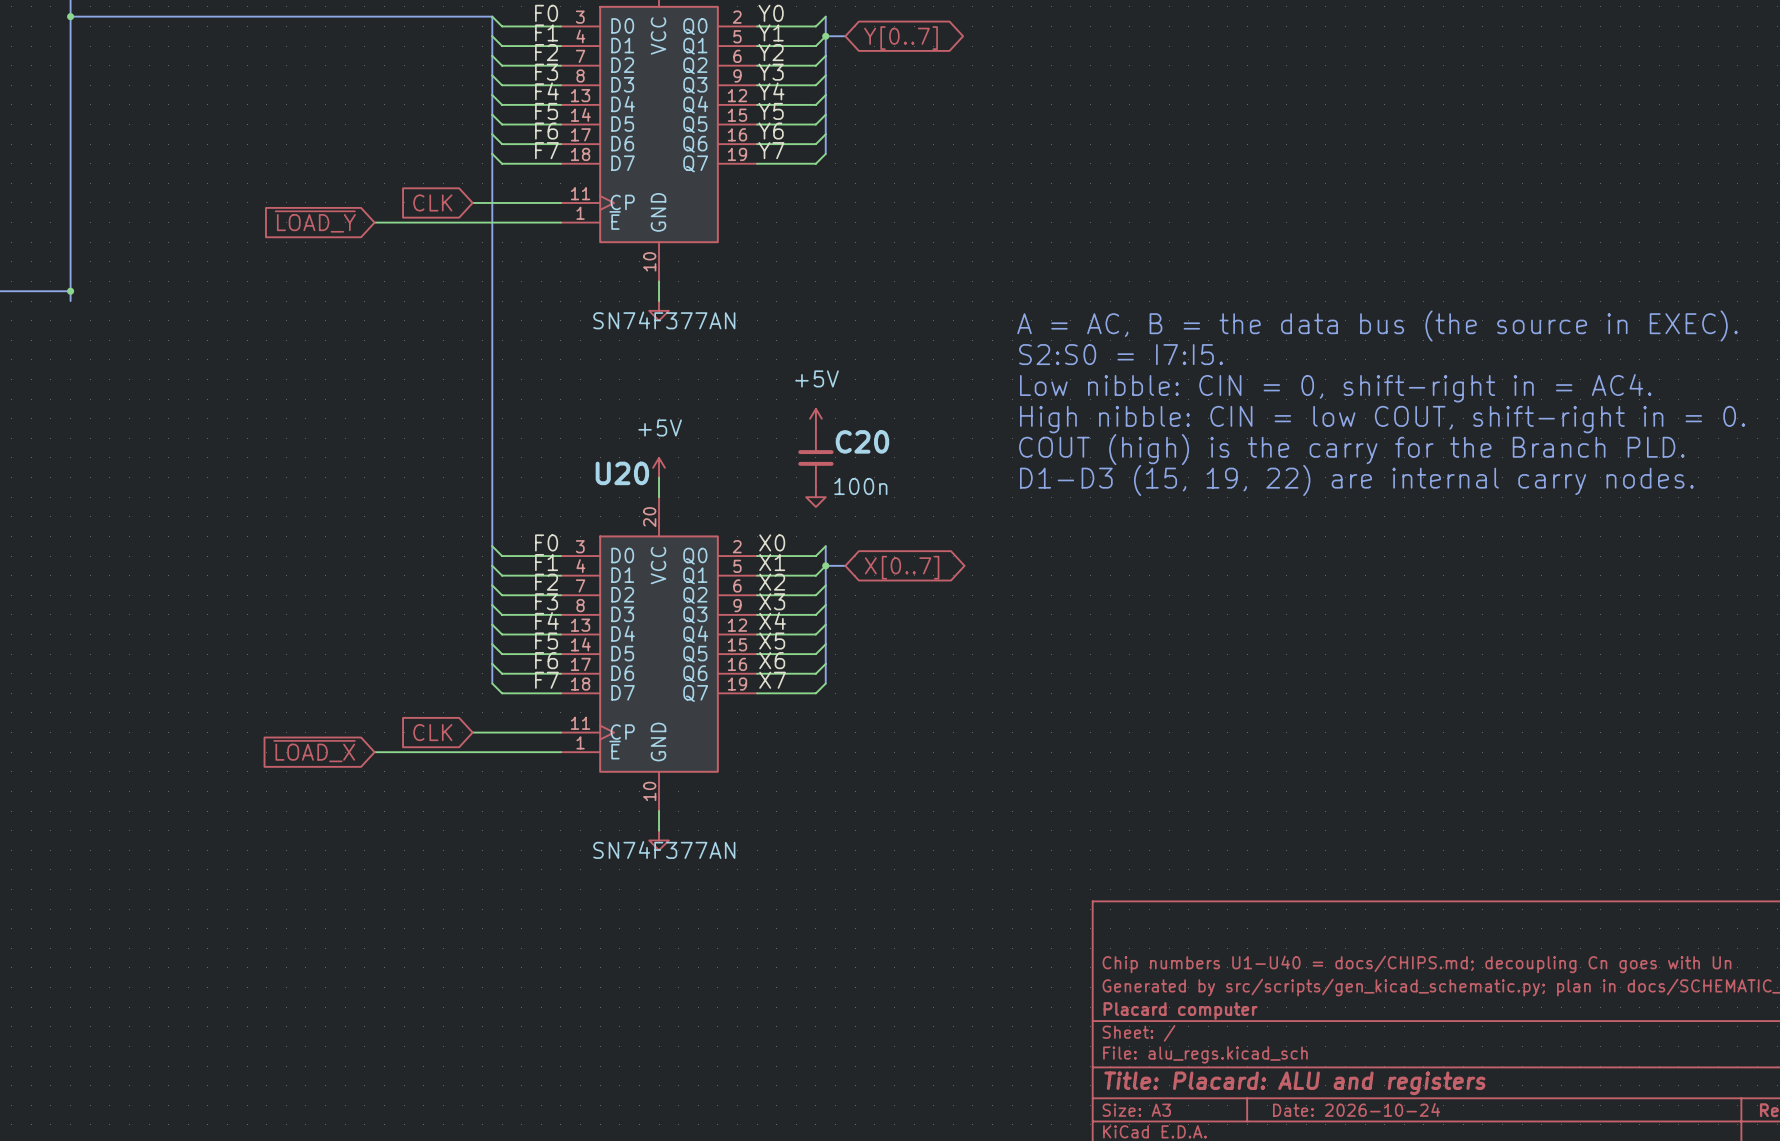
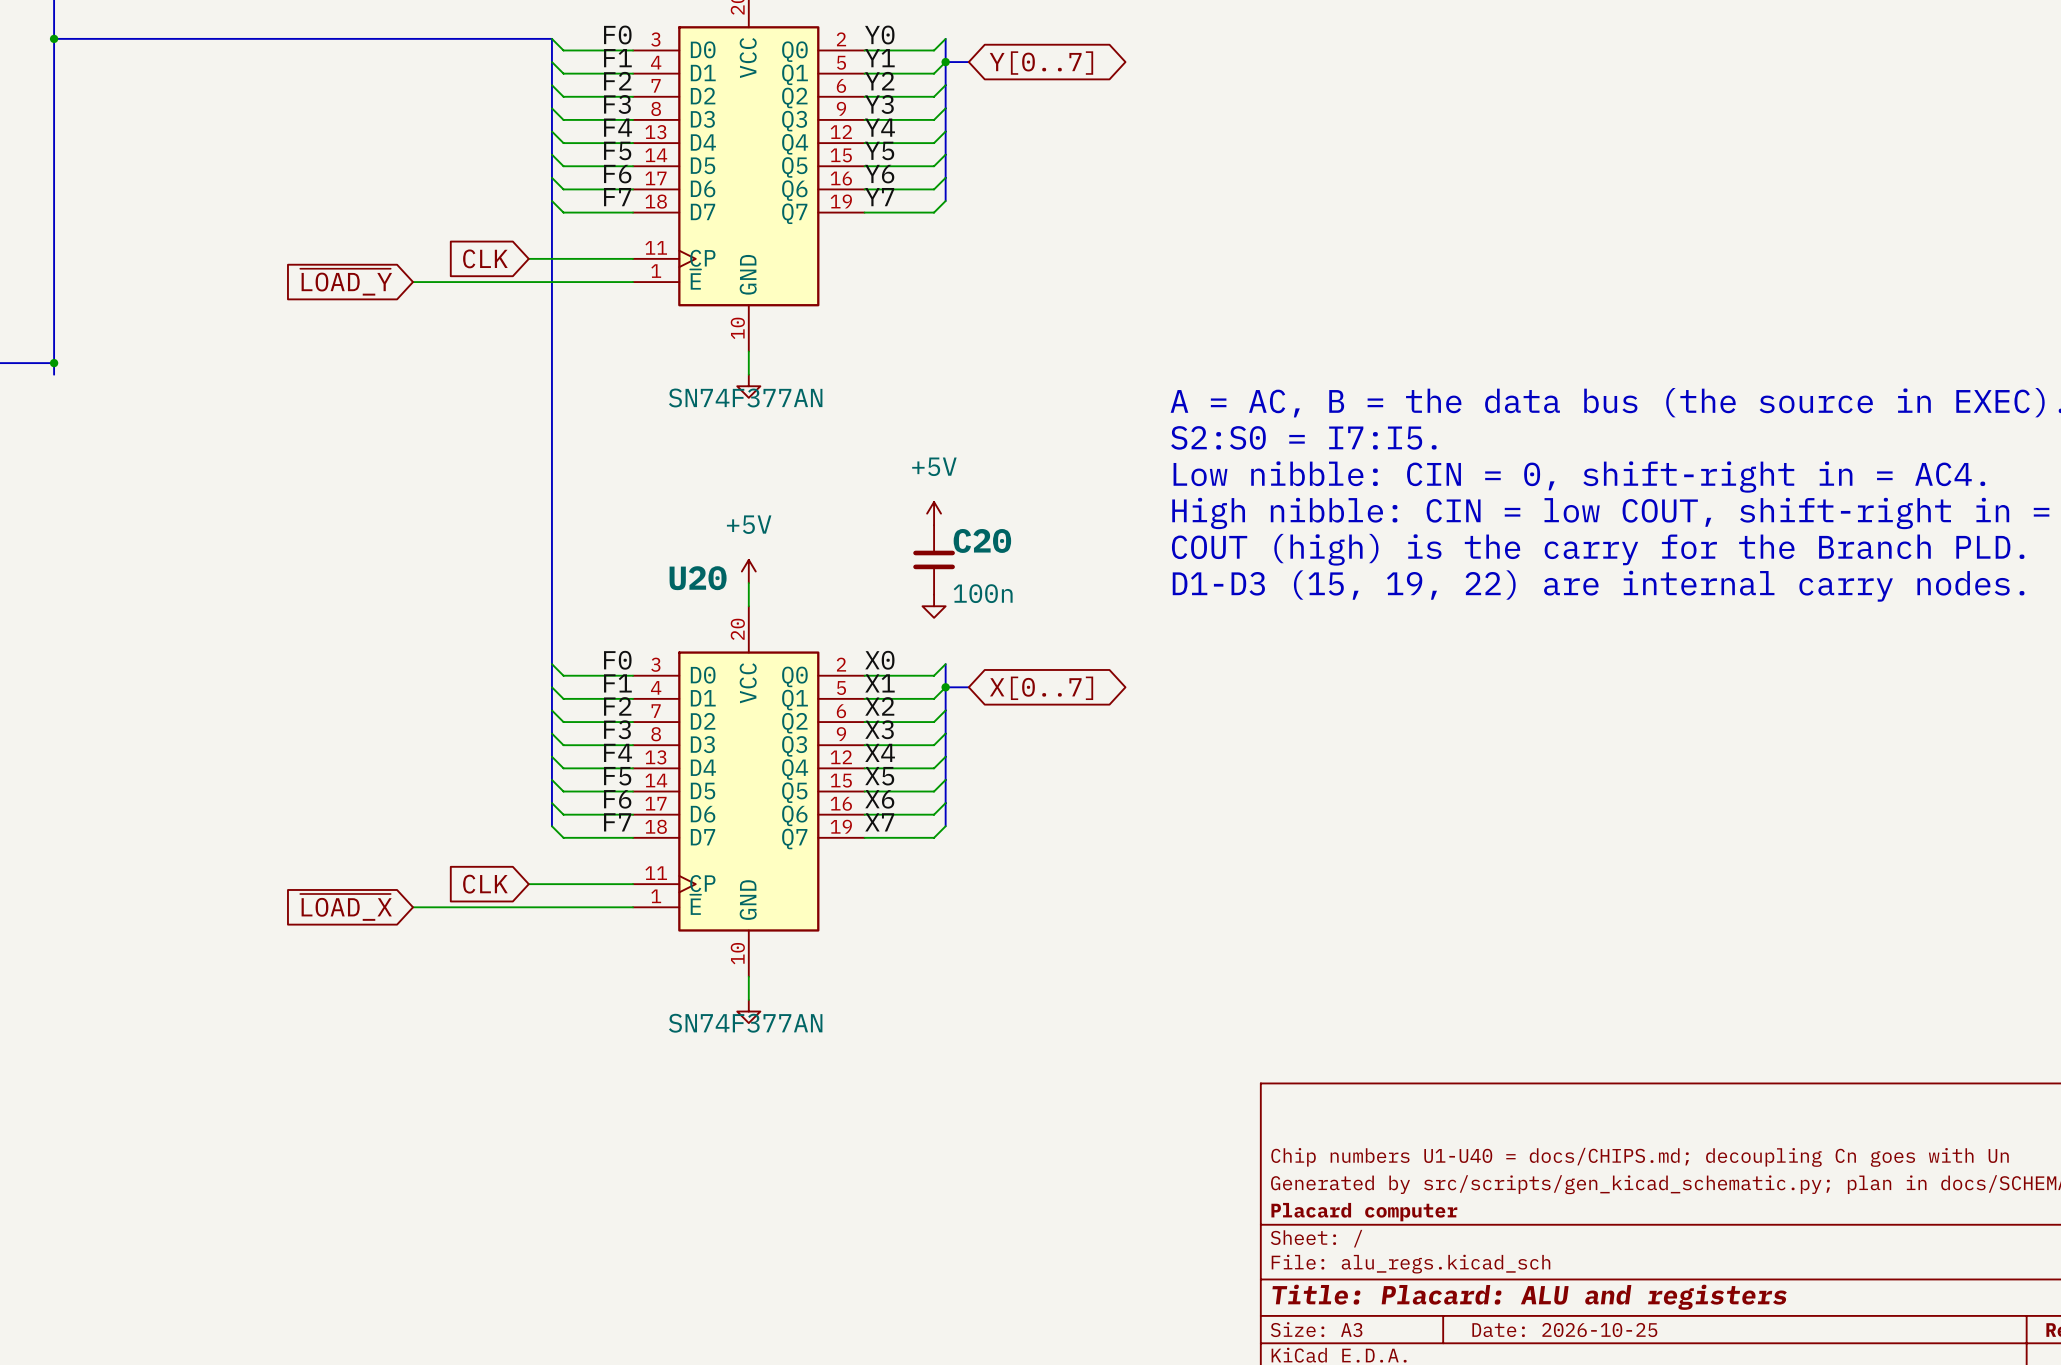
title block: Date: 2026-10-24 (1356, 1109) -> Date: 2026-10-25 (1564, 1330)

